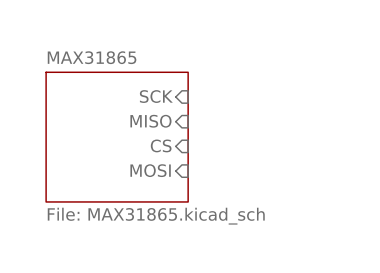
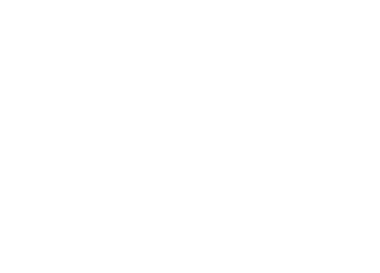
sheet pin: SCK (156, 96) -> none
sheet pin: MISO (150, 121) -> none
sheet MAX31865: File: MAX31865.kicad_sch (117, 137) -> none
sheet pin: CS (161, 145) -> none
sheet pin: MOSI (150, 170) -> none

